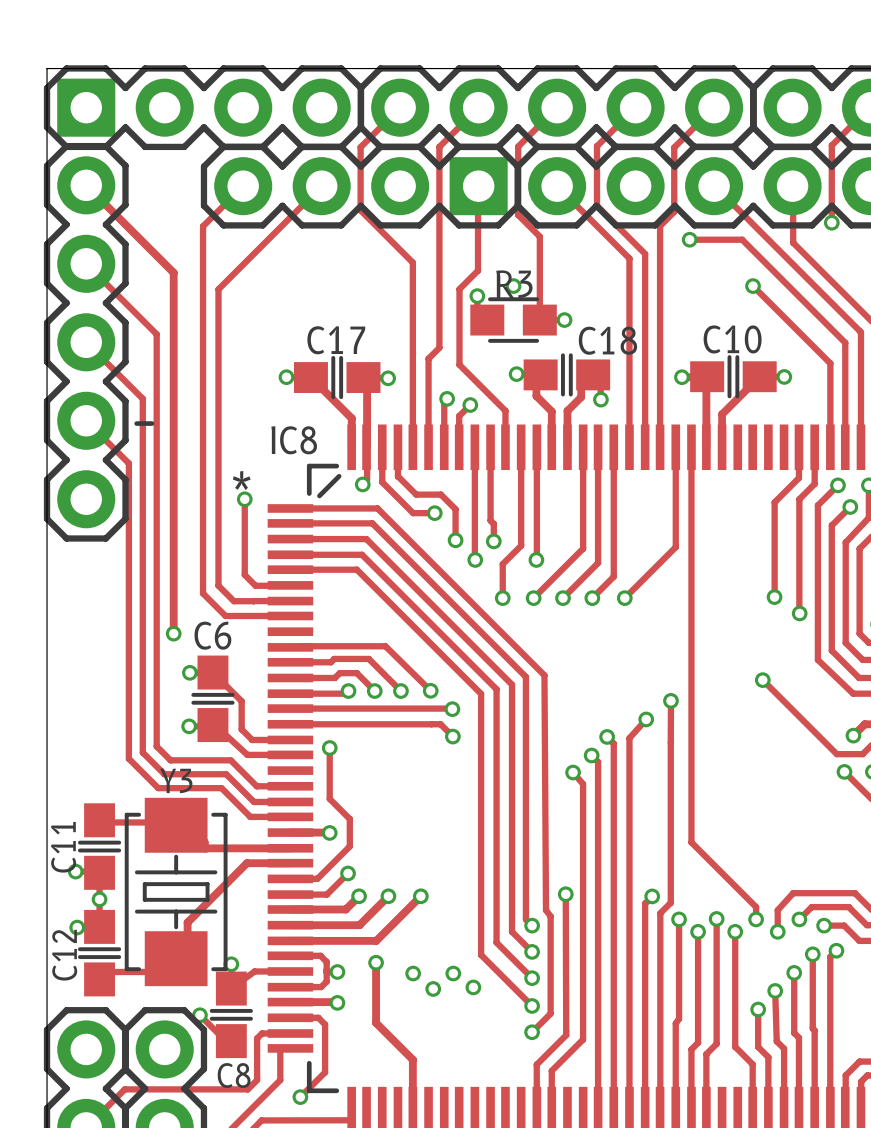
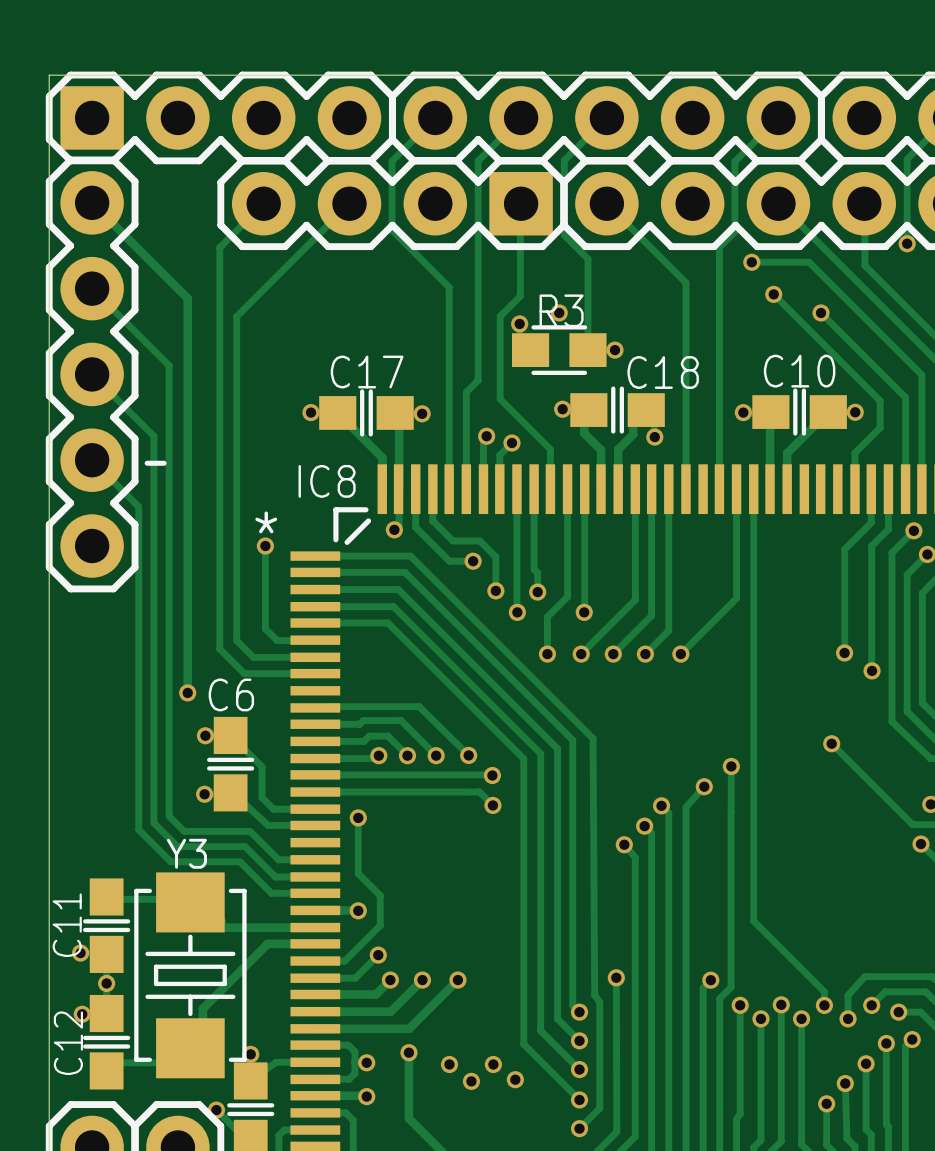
track: (635, 107) (596, 146) (596, 205) (645, 253) (645, 447) -> none
track: none -> (773, 294) (880, 400) (880, 427) (854, 452) (854, 489)
via: none -> (773, 294)

